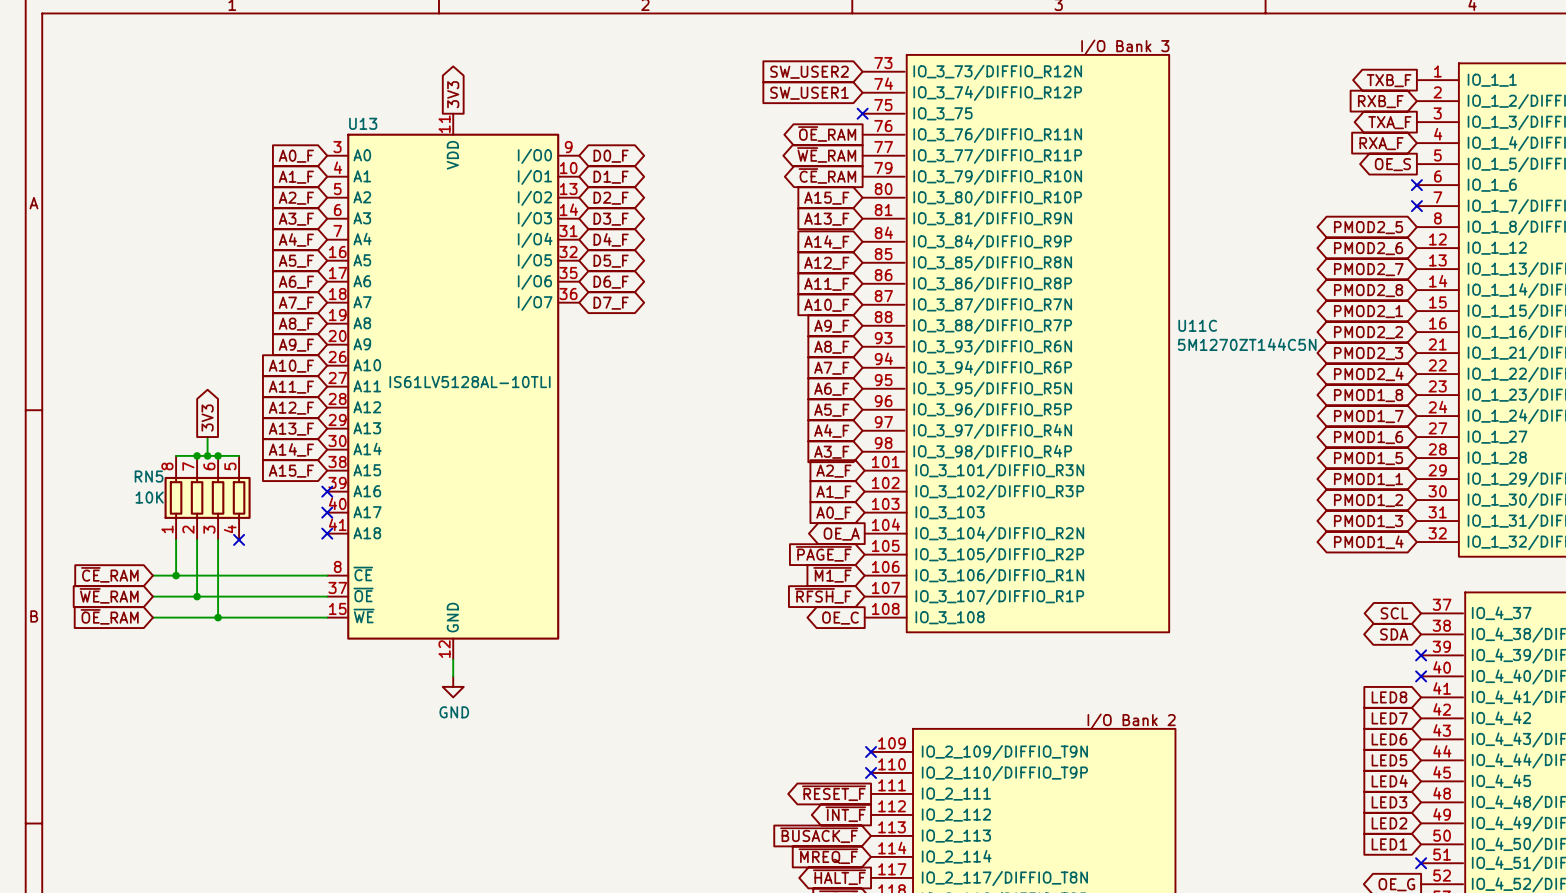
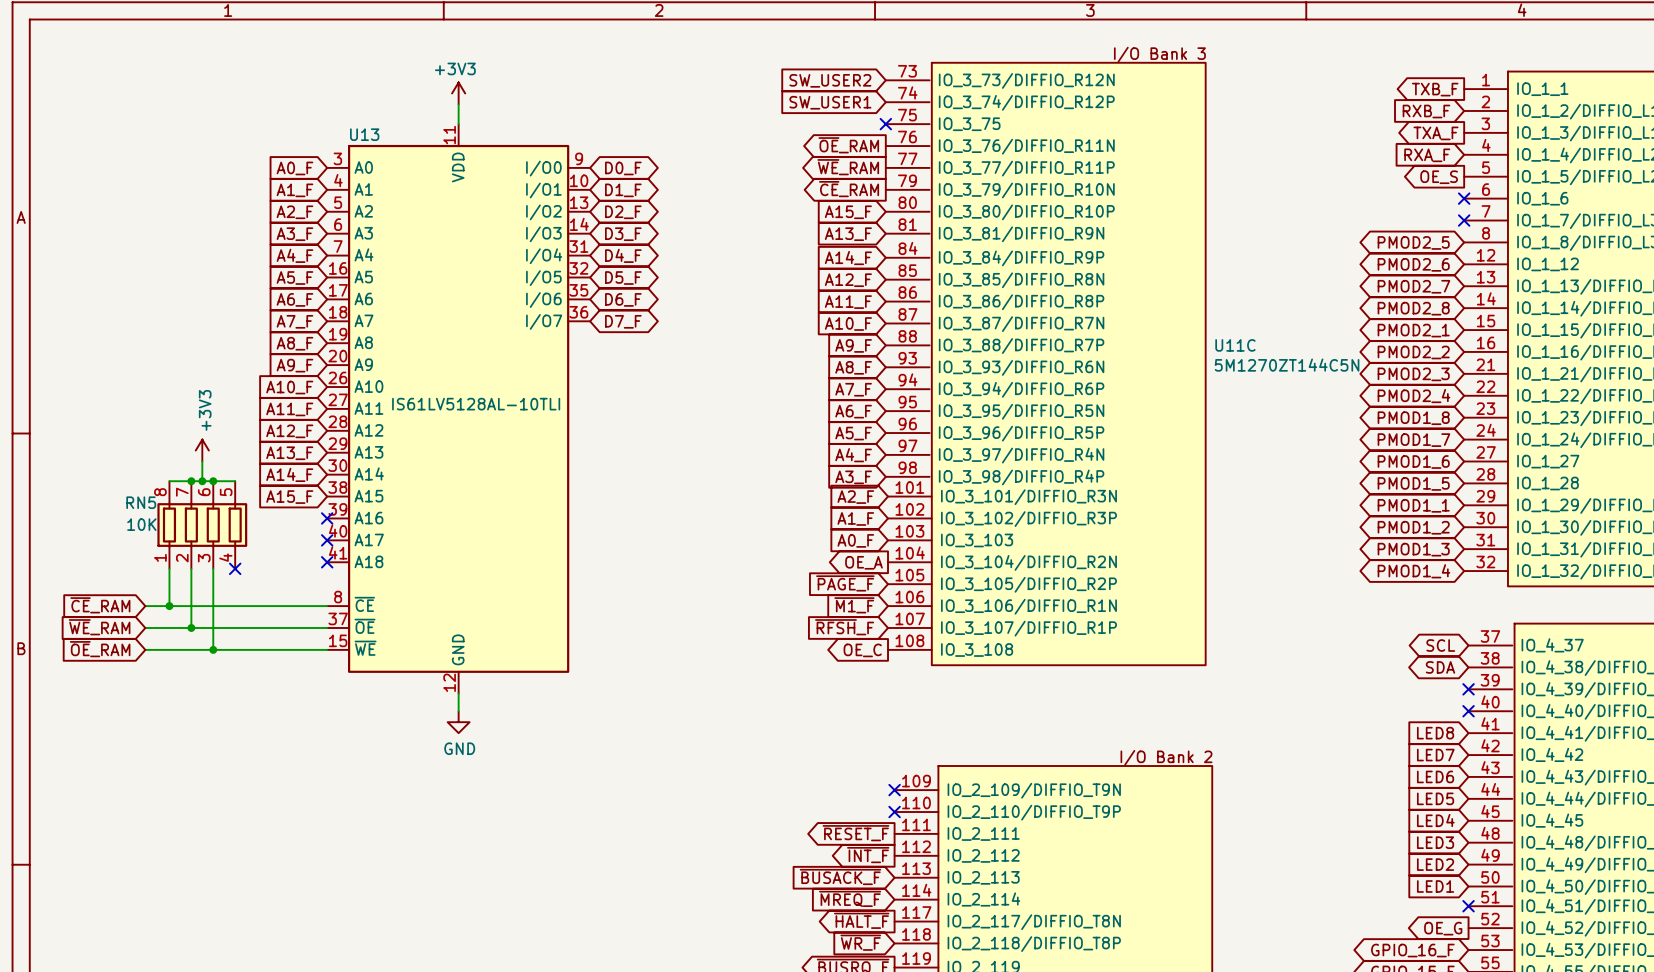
power symbol: none -> +3V3 (458, 93)
wire: none -> (458, 104) (458, 124)
global label: 3V3 (453, 94) -> none
global label: 3V3 (207, 418) -> none
power symbol: none -> +3V3 (202, 450)

